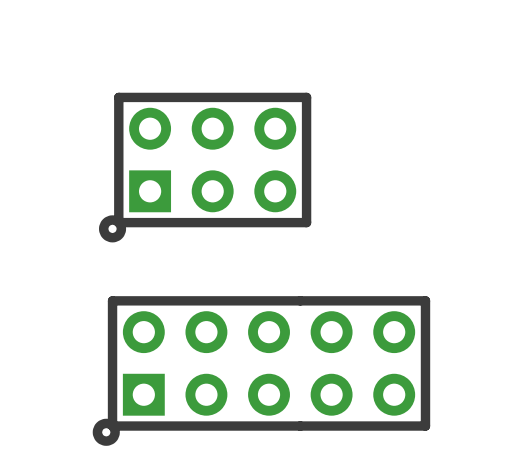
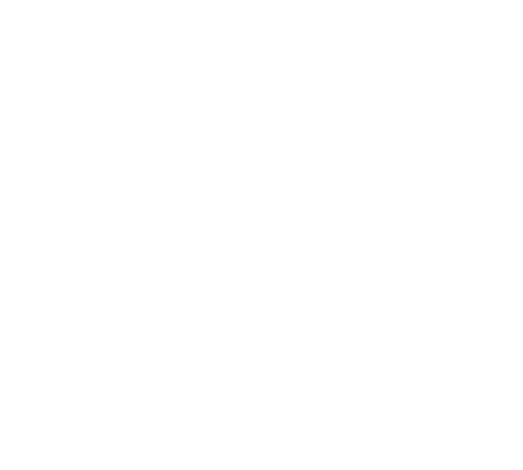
part: (205, 167) -> none
part: (261, 370) -> none

